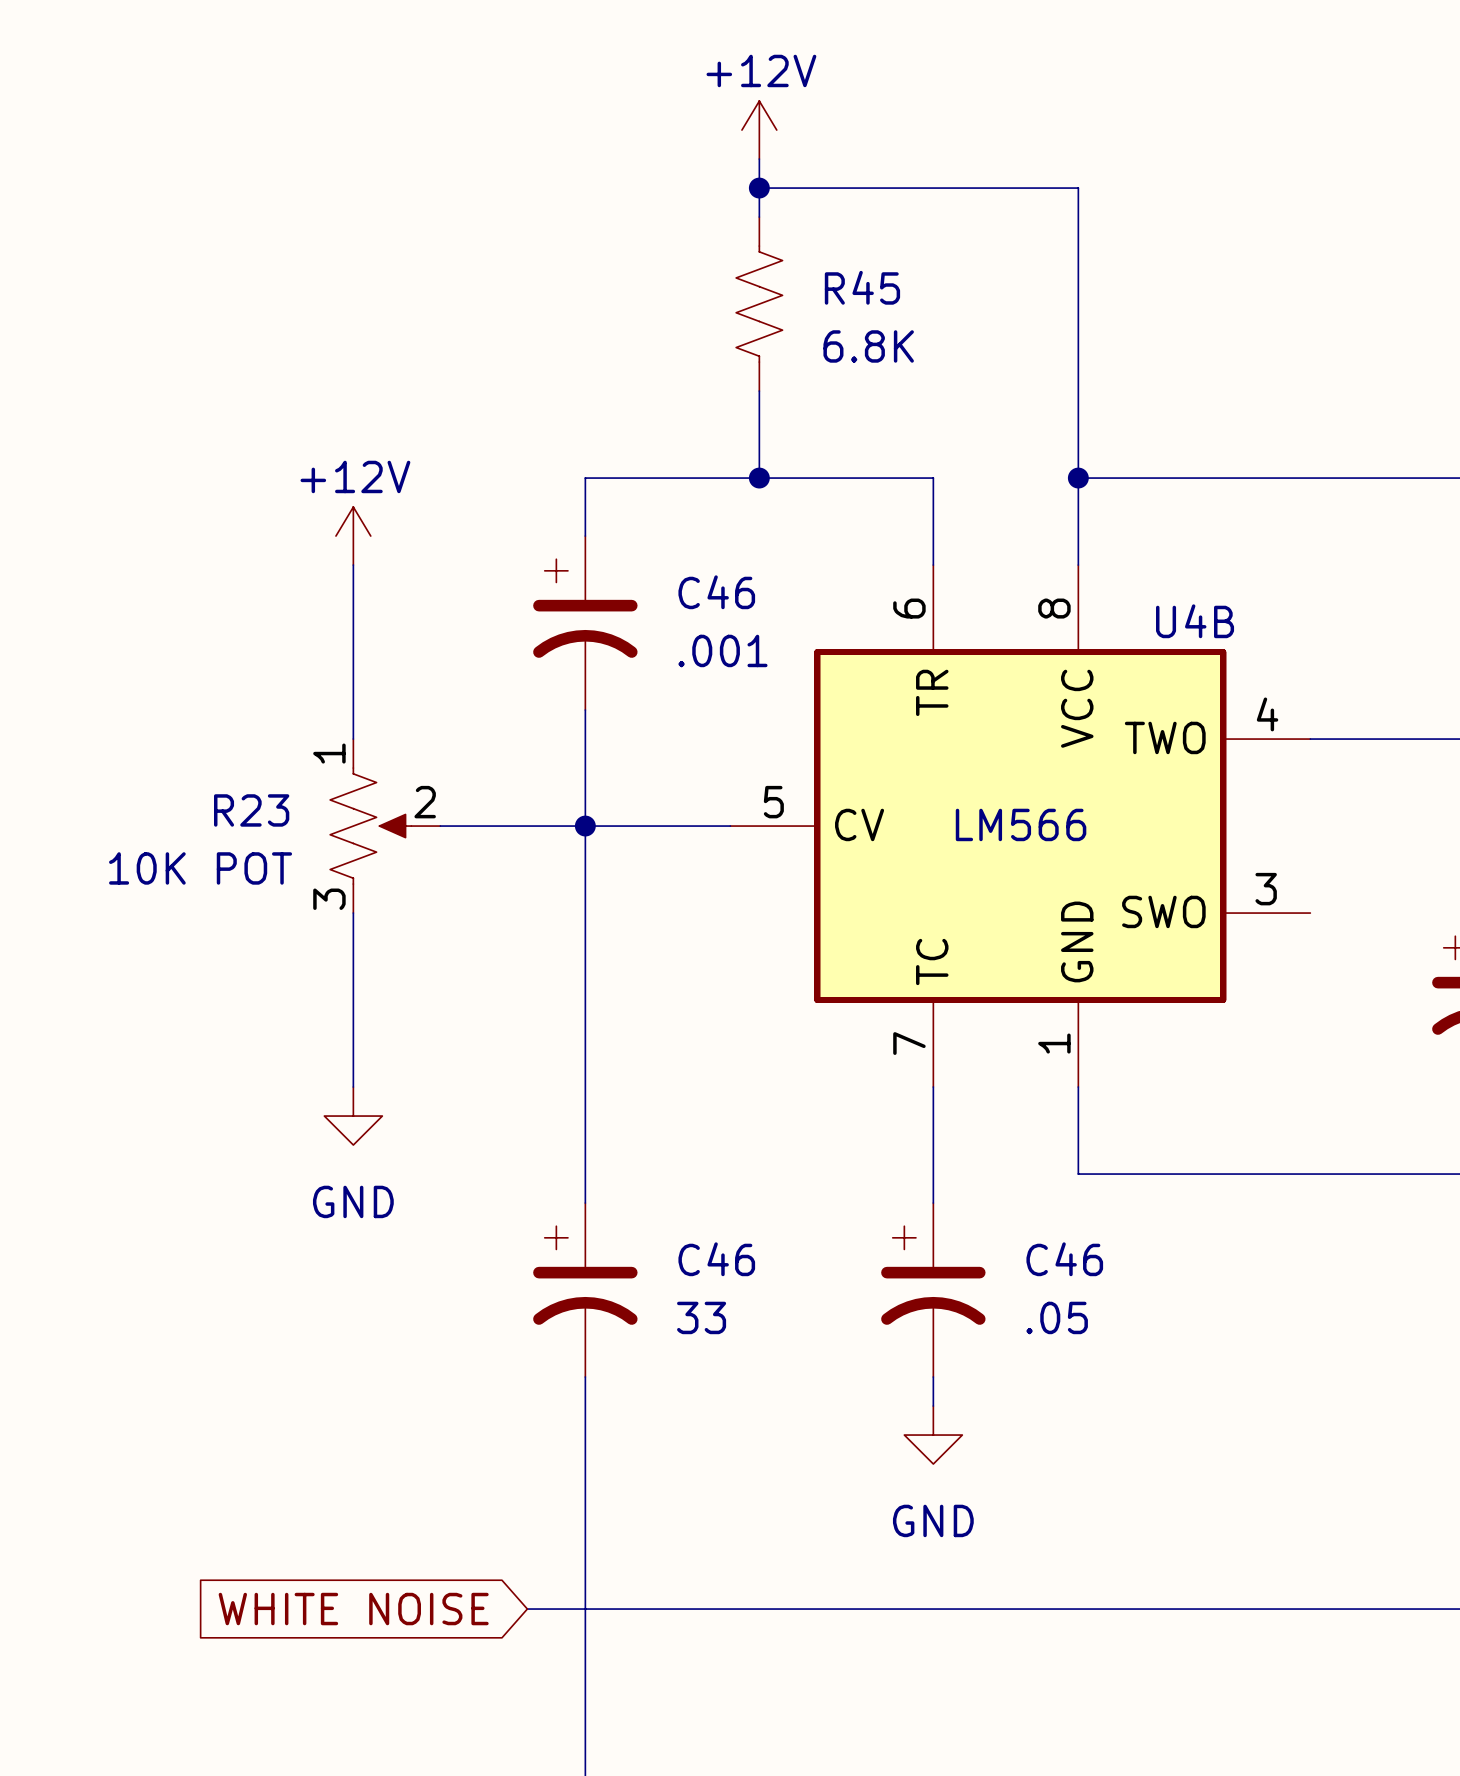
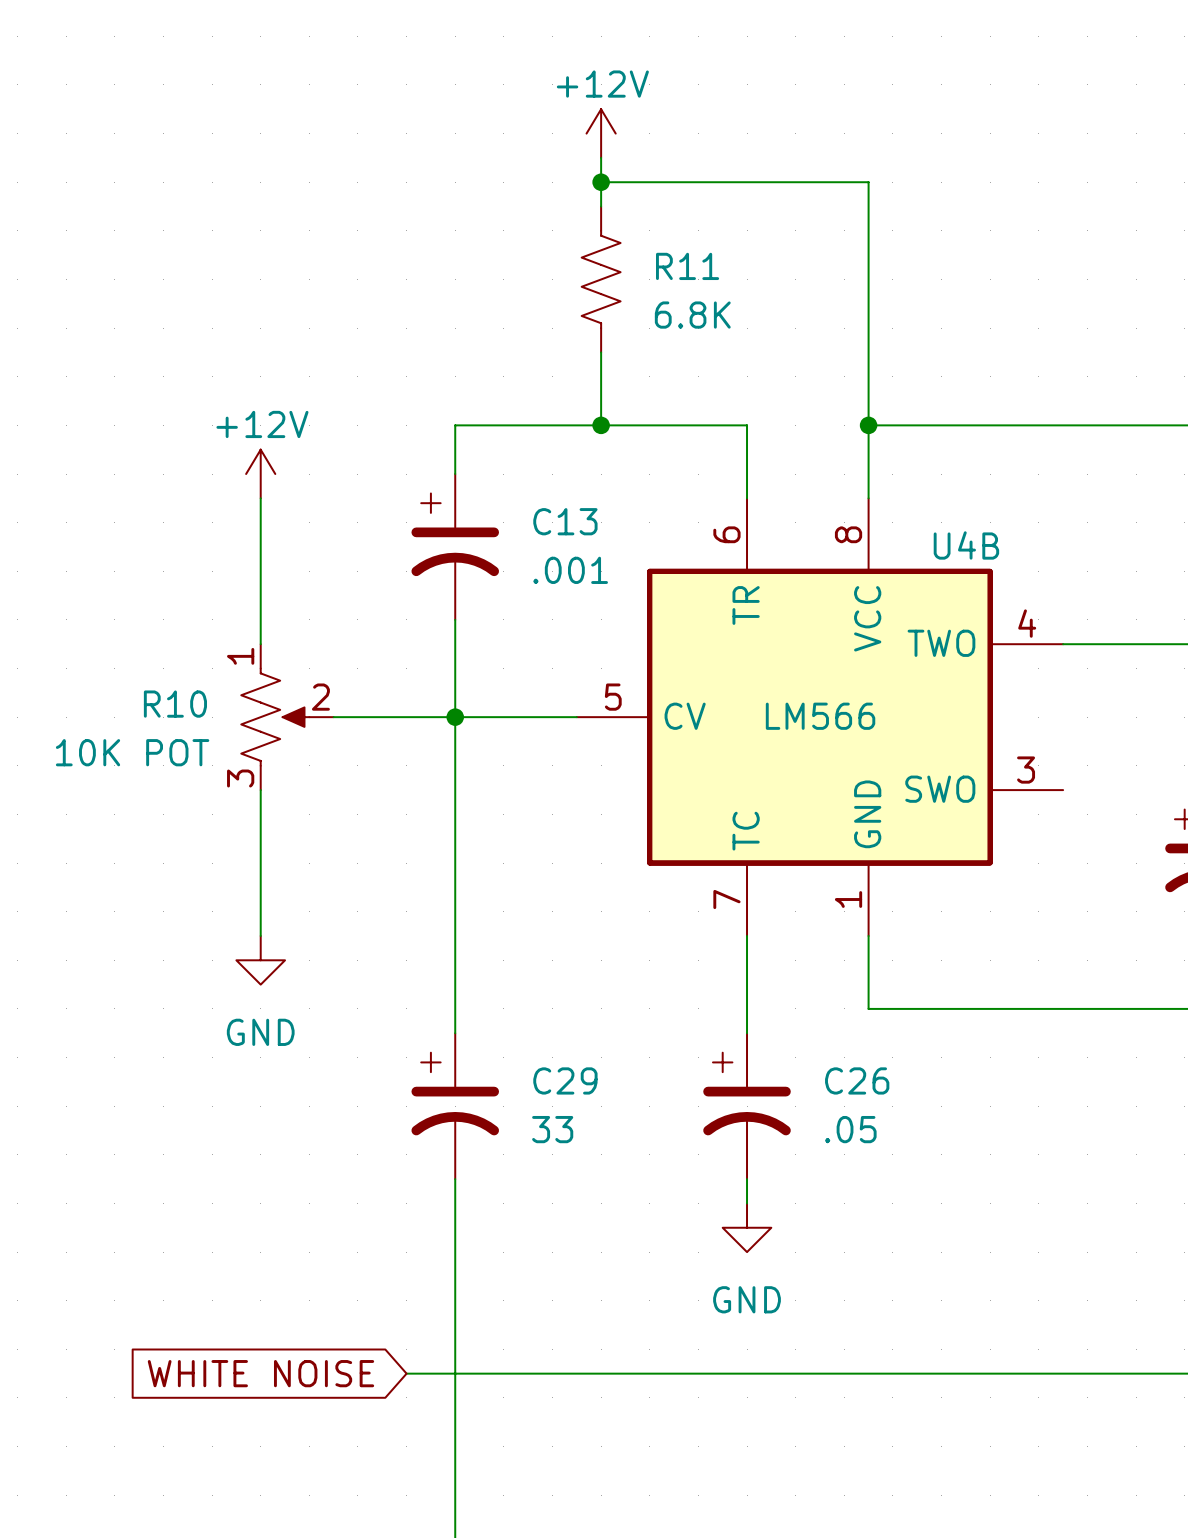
R45 name: R45 (862, 287) -> R11 (687, 266)
C46 name: C46 (716, 592) -> C13 (565, 521)
R23 name: R23 (251, 810) -> R10 (175, 704)
C46 name: C46 (716, 1259) -> C29 (565, 1080)
C46 name: C46 (1064, 1259) -> C26 (857, 1080)

